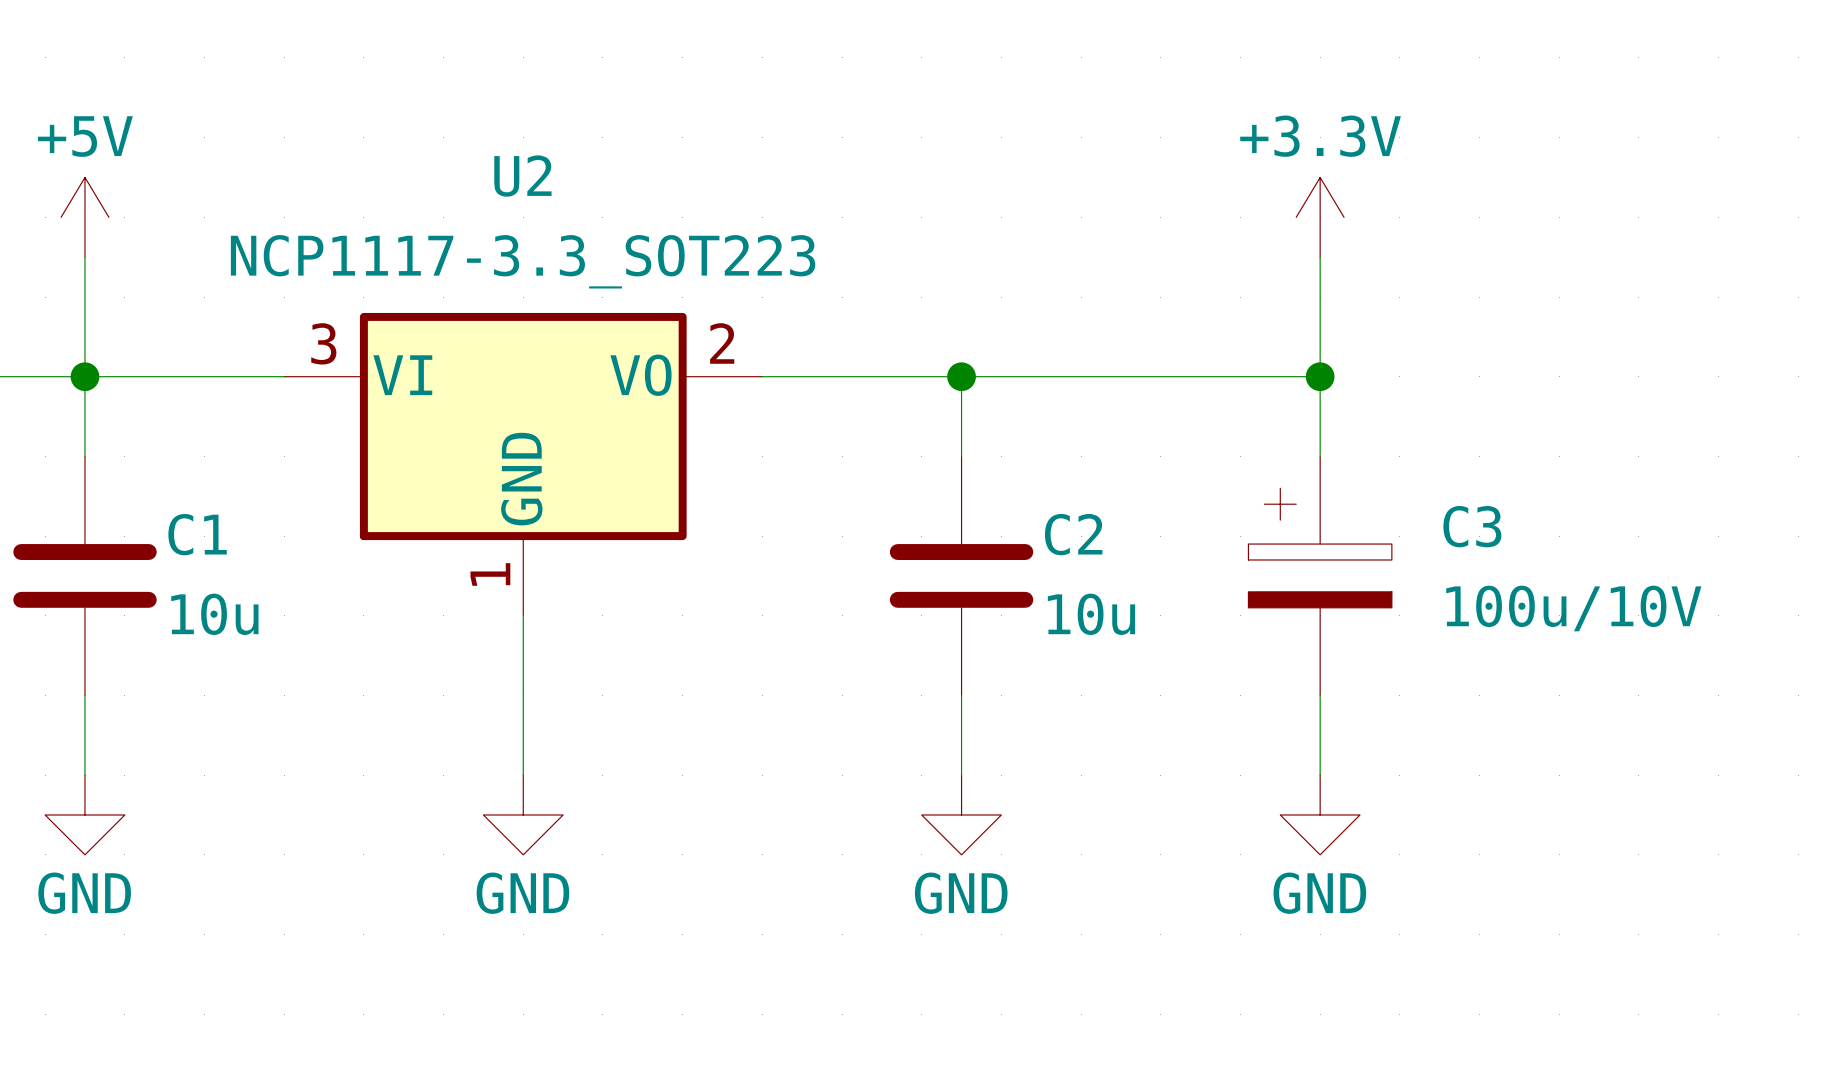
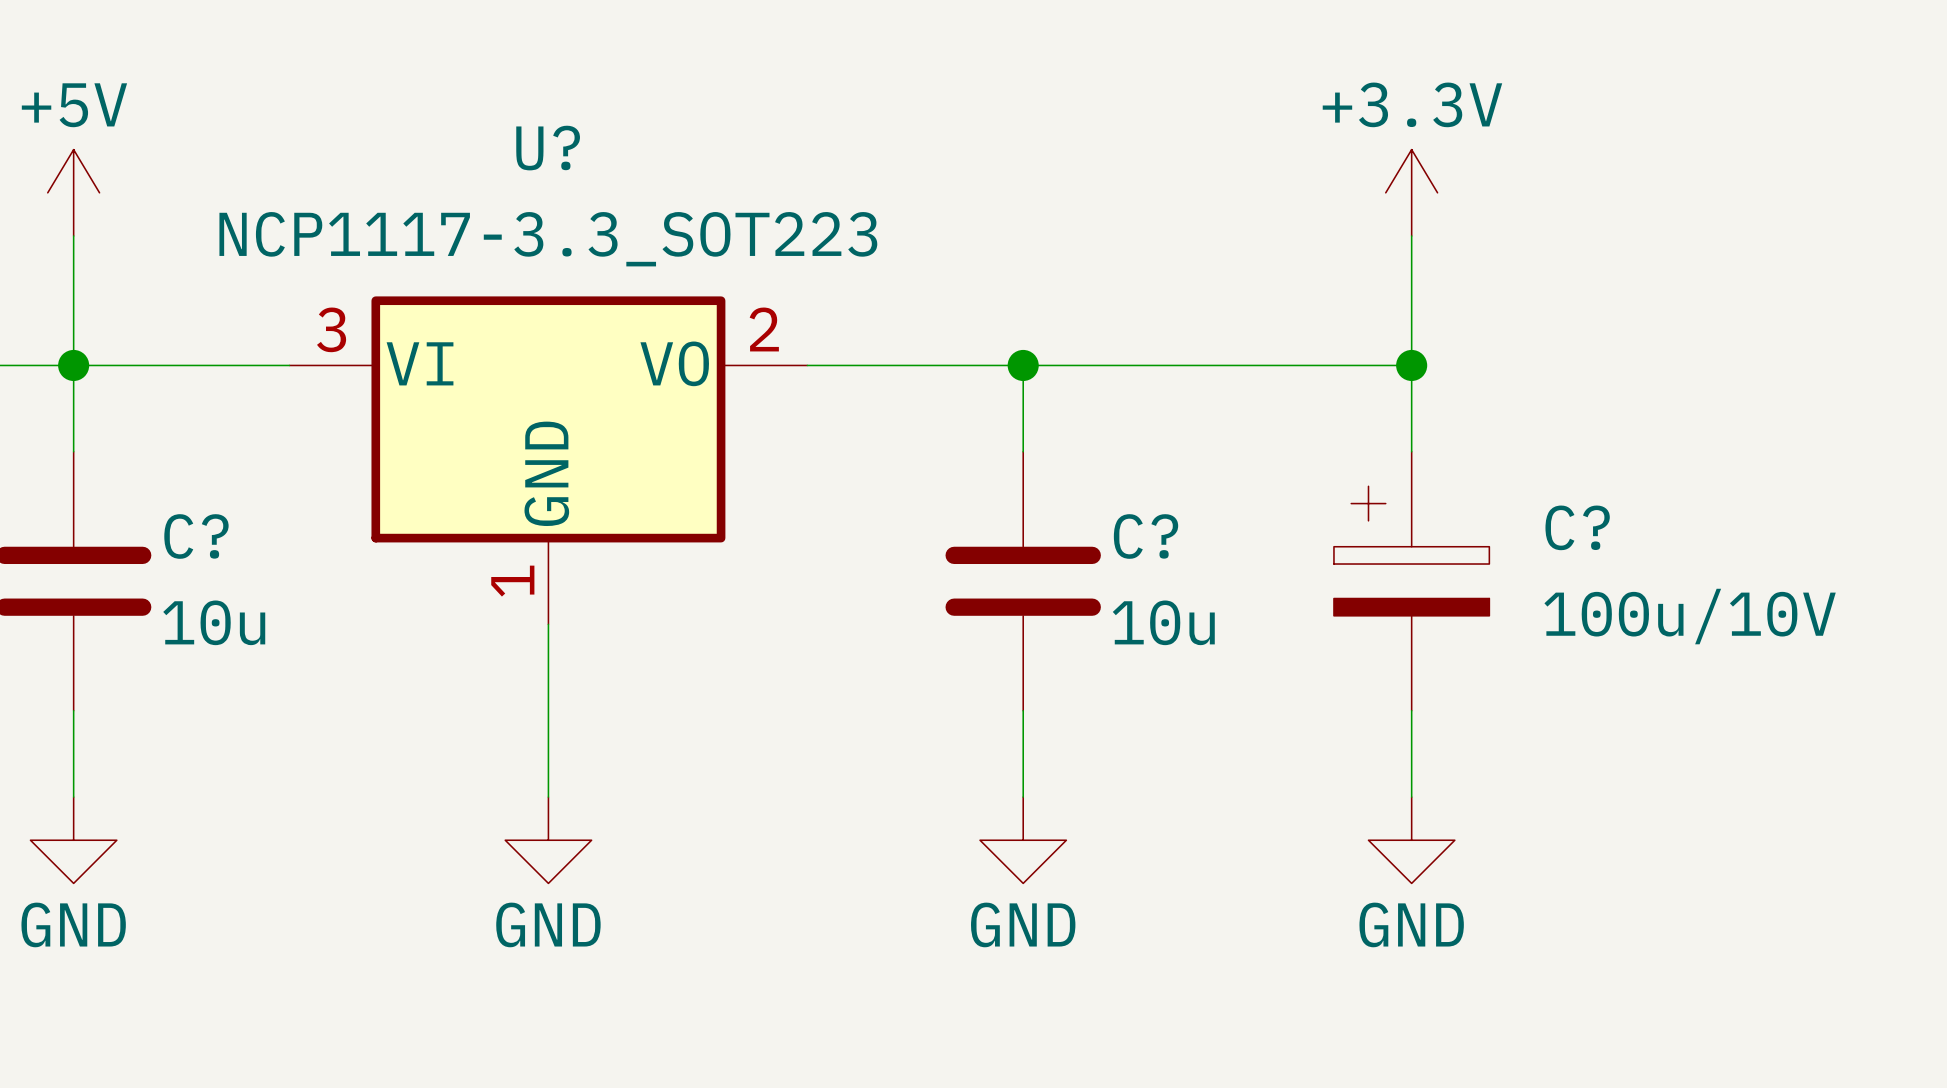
U2 name: U2 (522, 176) -> U? (548, 148)
C3 name: C3 (1472, 526) -> C? (1577, 527)
C1 name: C1 (197, 534) -> C? (196, 536)
C2 name: C2 (1073, 534) -> C? (1146, 536)

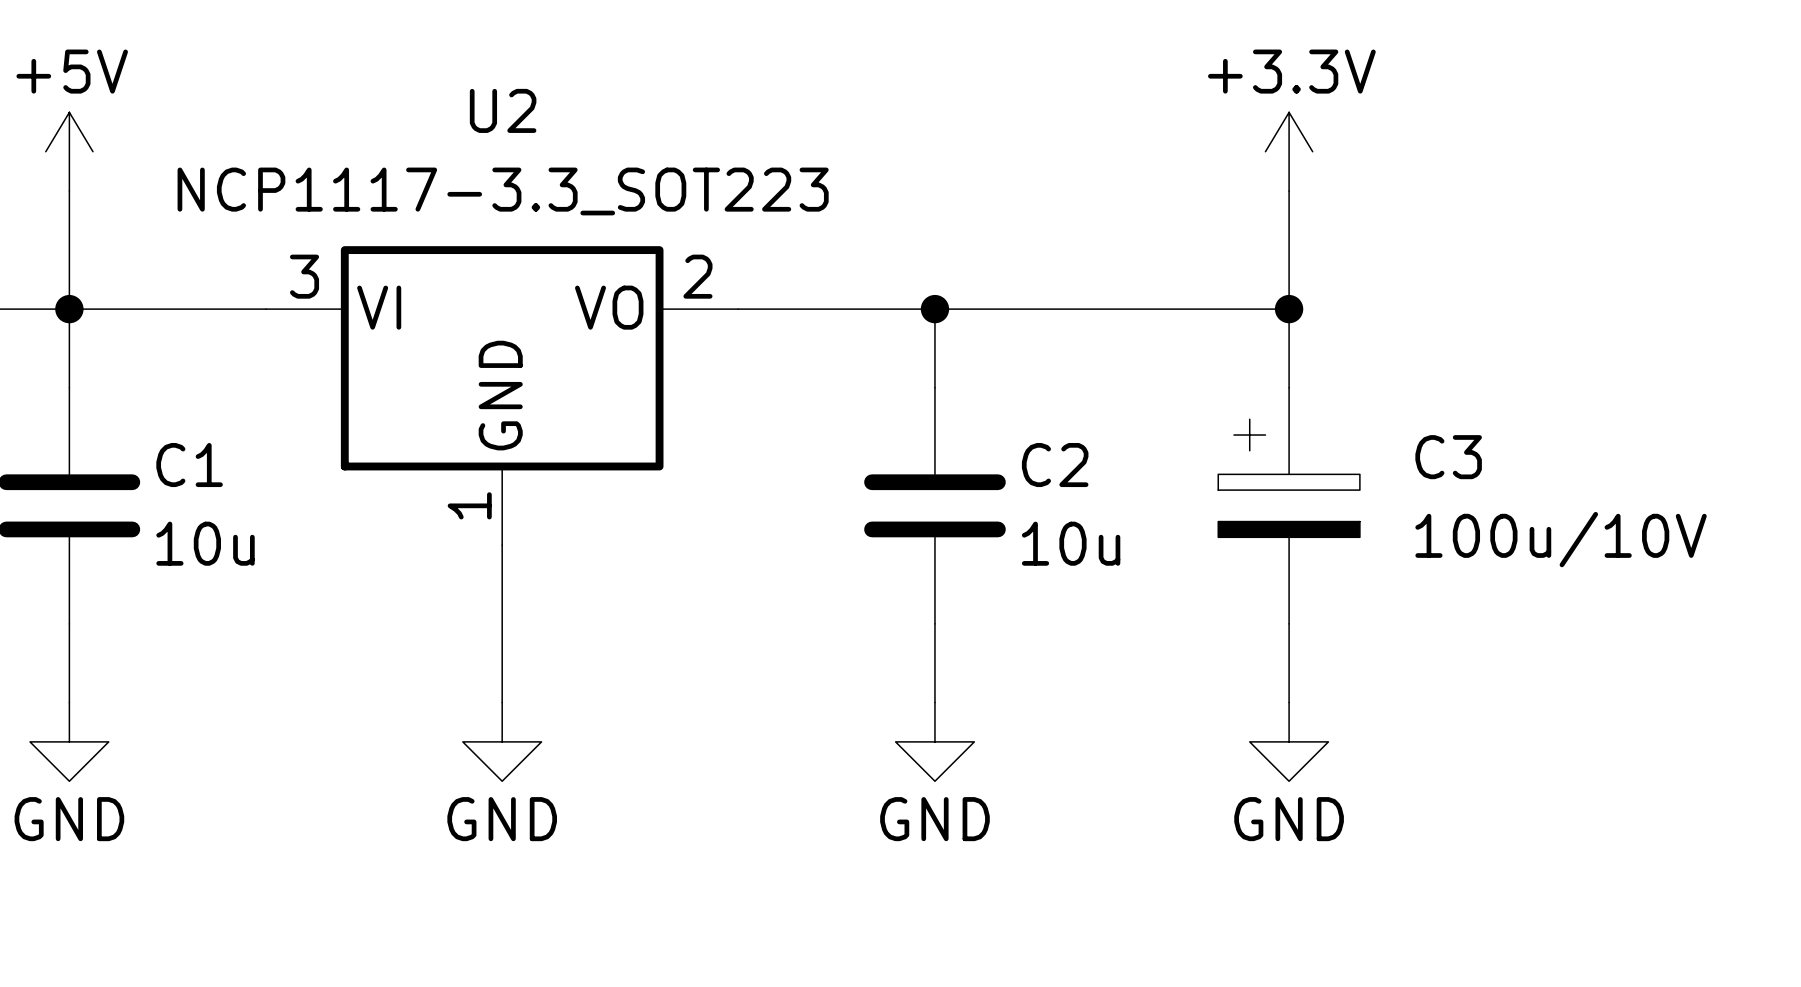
U? name: U? (548, 148) -> U2 (503, 110)
C? name: C? (1577, 527) -> C3 (1448, 457)
C? name: C? (196, 536) -> C1 (189, 465)
C? name: C? (1146, 536) -> C2 (1055, 465)

